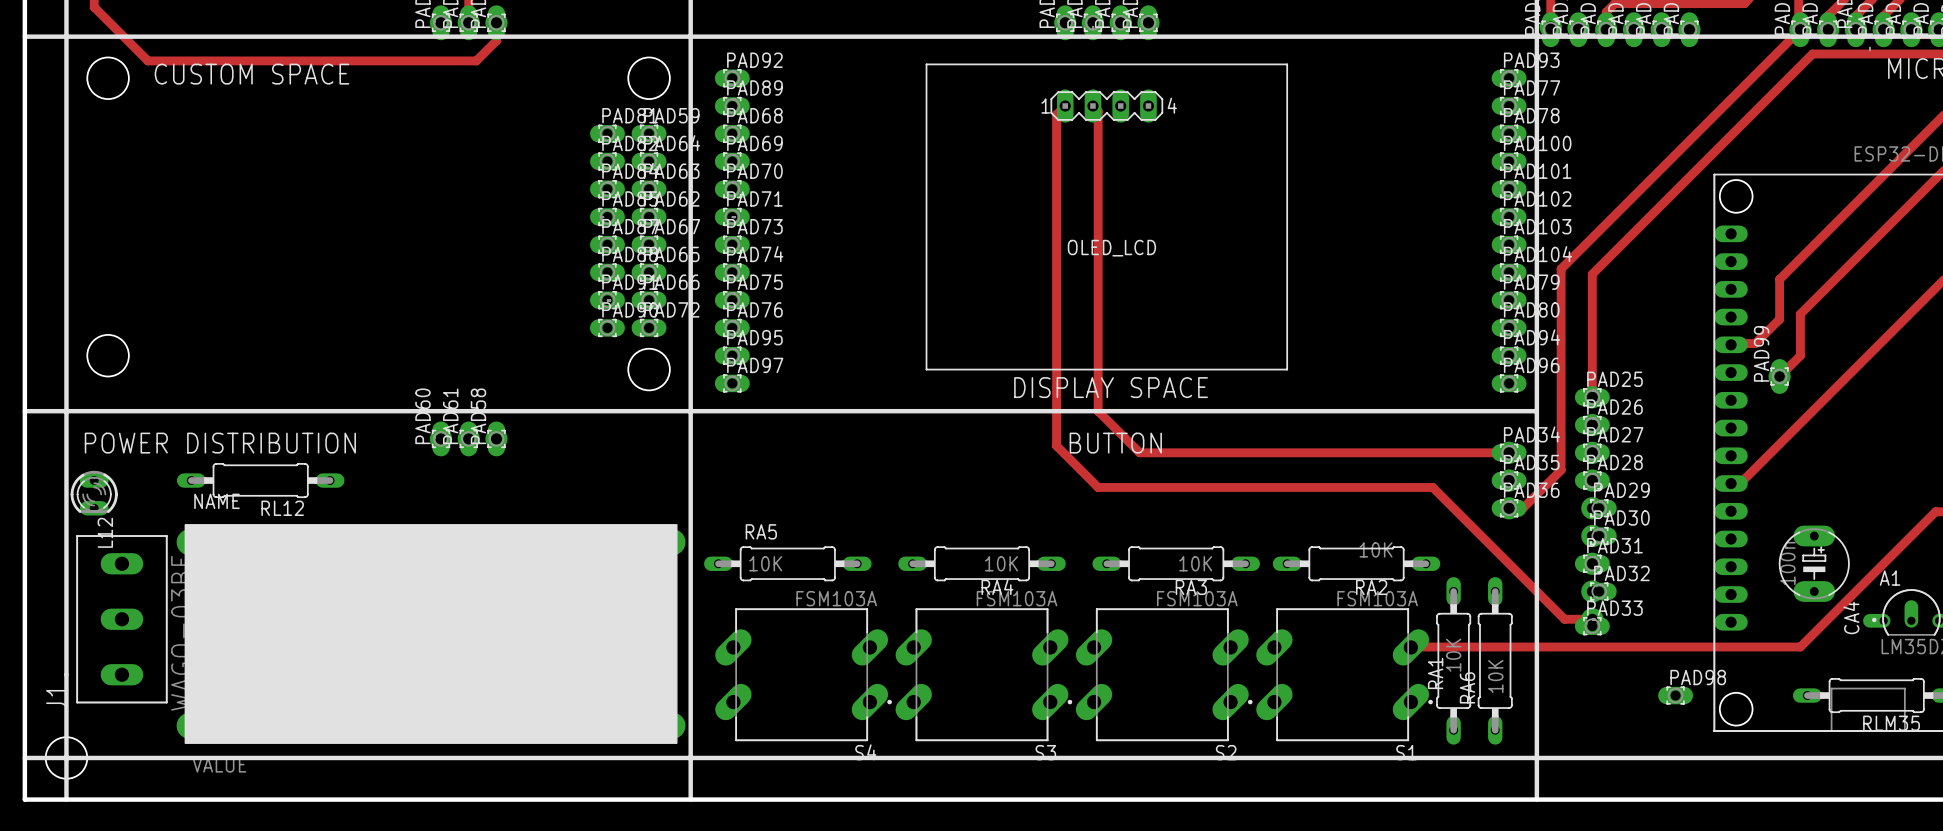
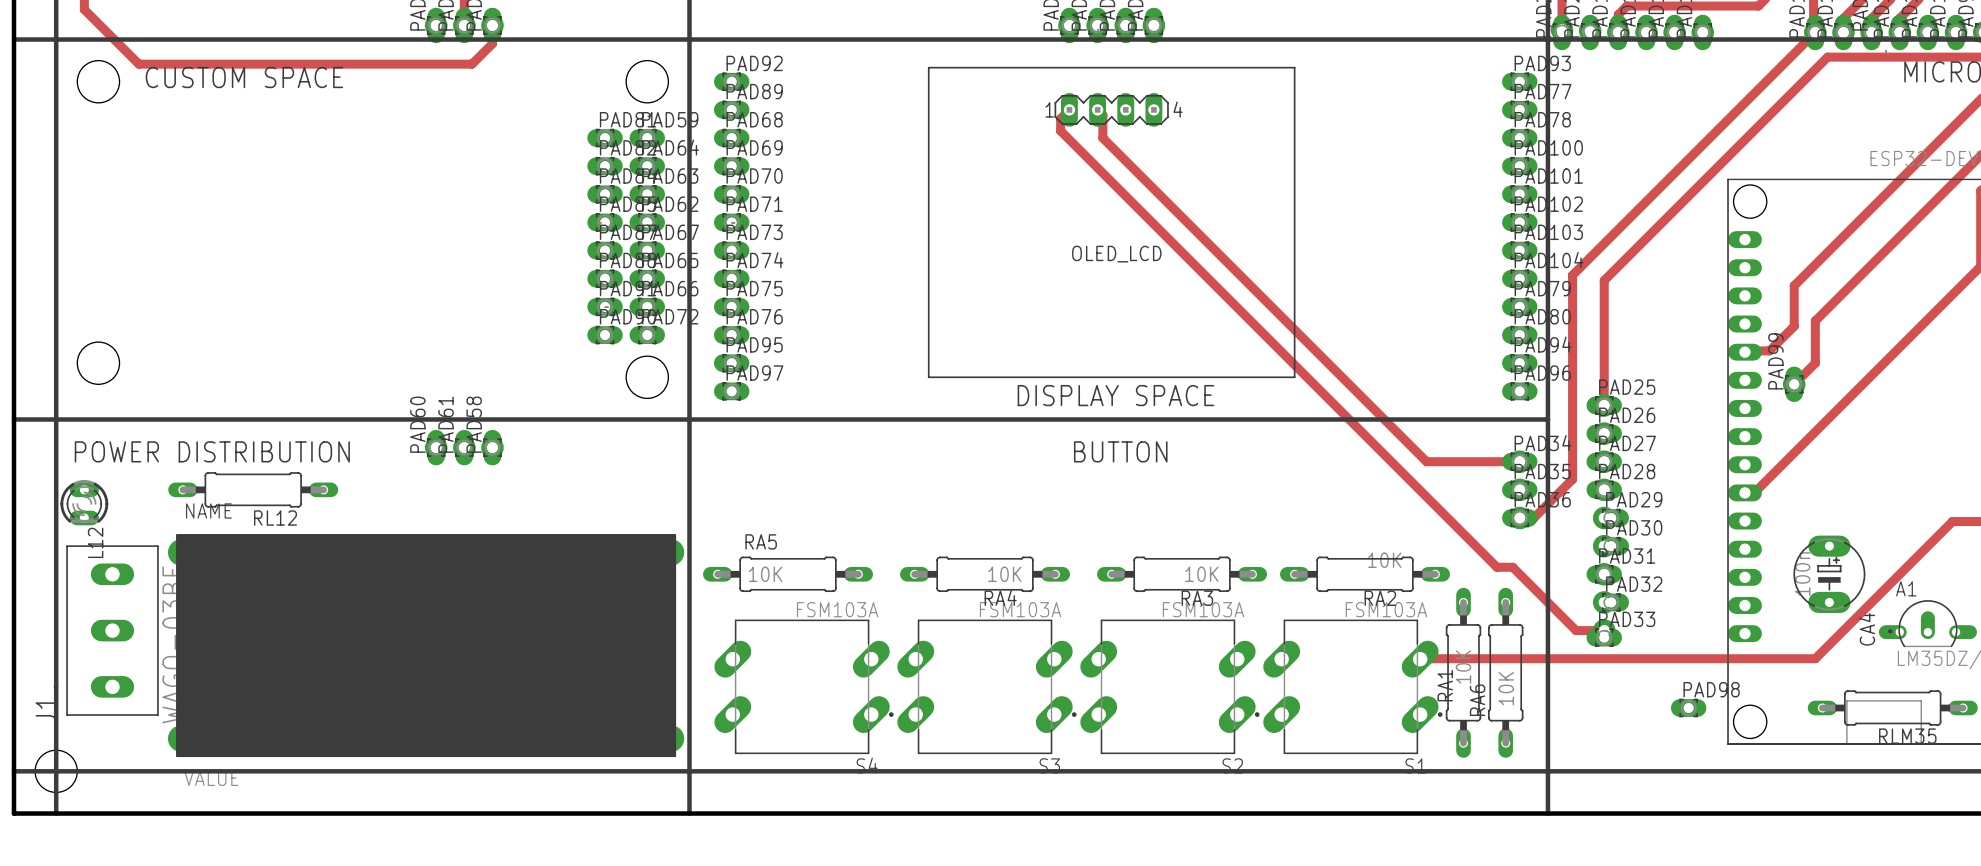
track: (1056, 126) (1056, 445) (1098, 487) (1432, 487) (1502, 556) -> (1060, 131) (1496, 567) (1512, 567)
track: (1098, 133) (1098, 411) (1139, 452) (1417, 452) -> (1102, 138) (1426, 461)

